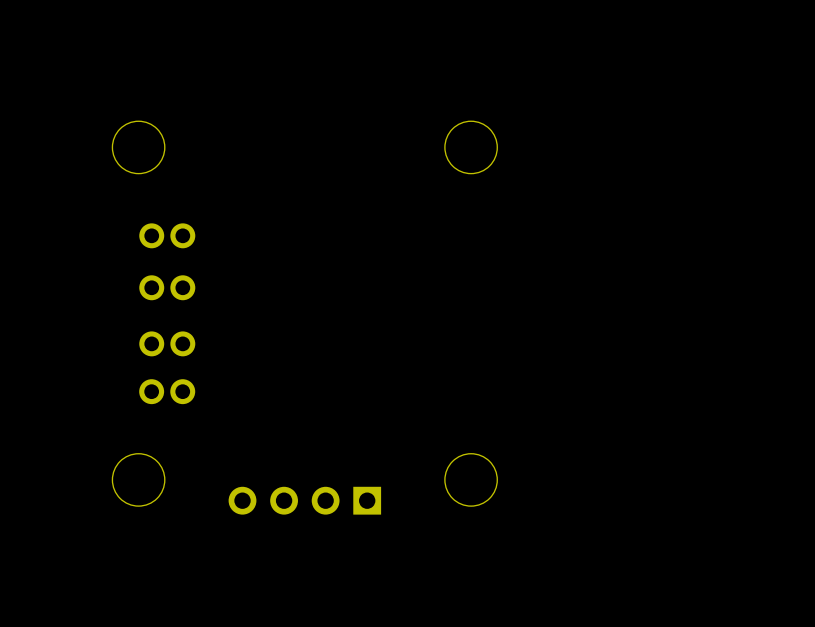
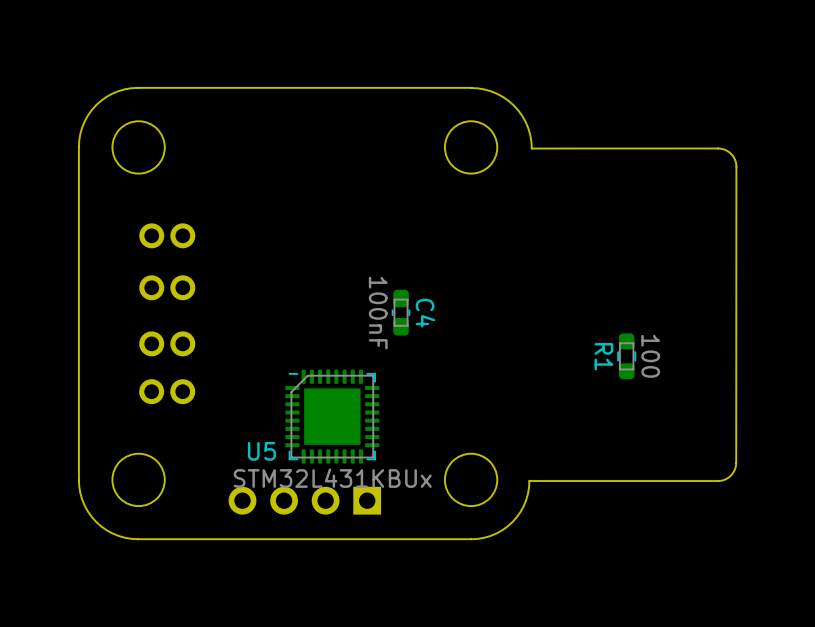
board edge: none -> (471, 87) (137, 87) (118, 91) (96, 105) (82, 127) (78, 146) (78, 480) (80, 493) (87, 511) (106, 530) (131, 538) (477, 538) (496, 533) (512, 522) (523, 506) (529, 481) (718, 481)
board edge: none -> (471, 88) (491, 91) (503, 97) (514, 105) (525, 122) (530, 135) (531, 148) (720, 148) (731, 153) (736, 166)
board edge: none -> (736, 166) (736, 462) (730, 475) (717, 481)
C4: none -> 100nF (401, 312)
R1: none -> 100 (626, 356)
U5: none -> STM32L431KBUx (332, 416)

